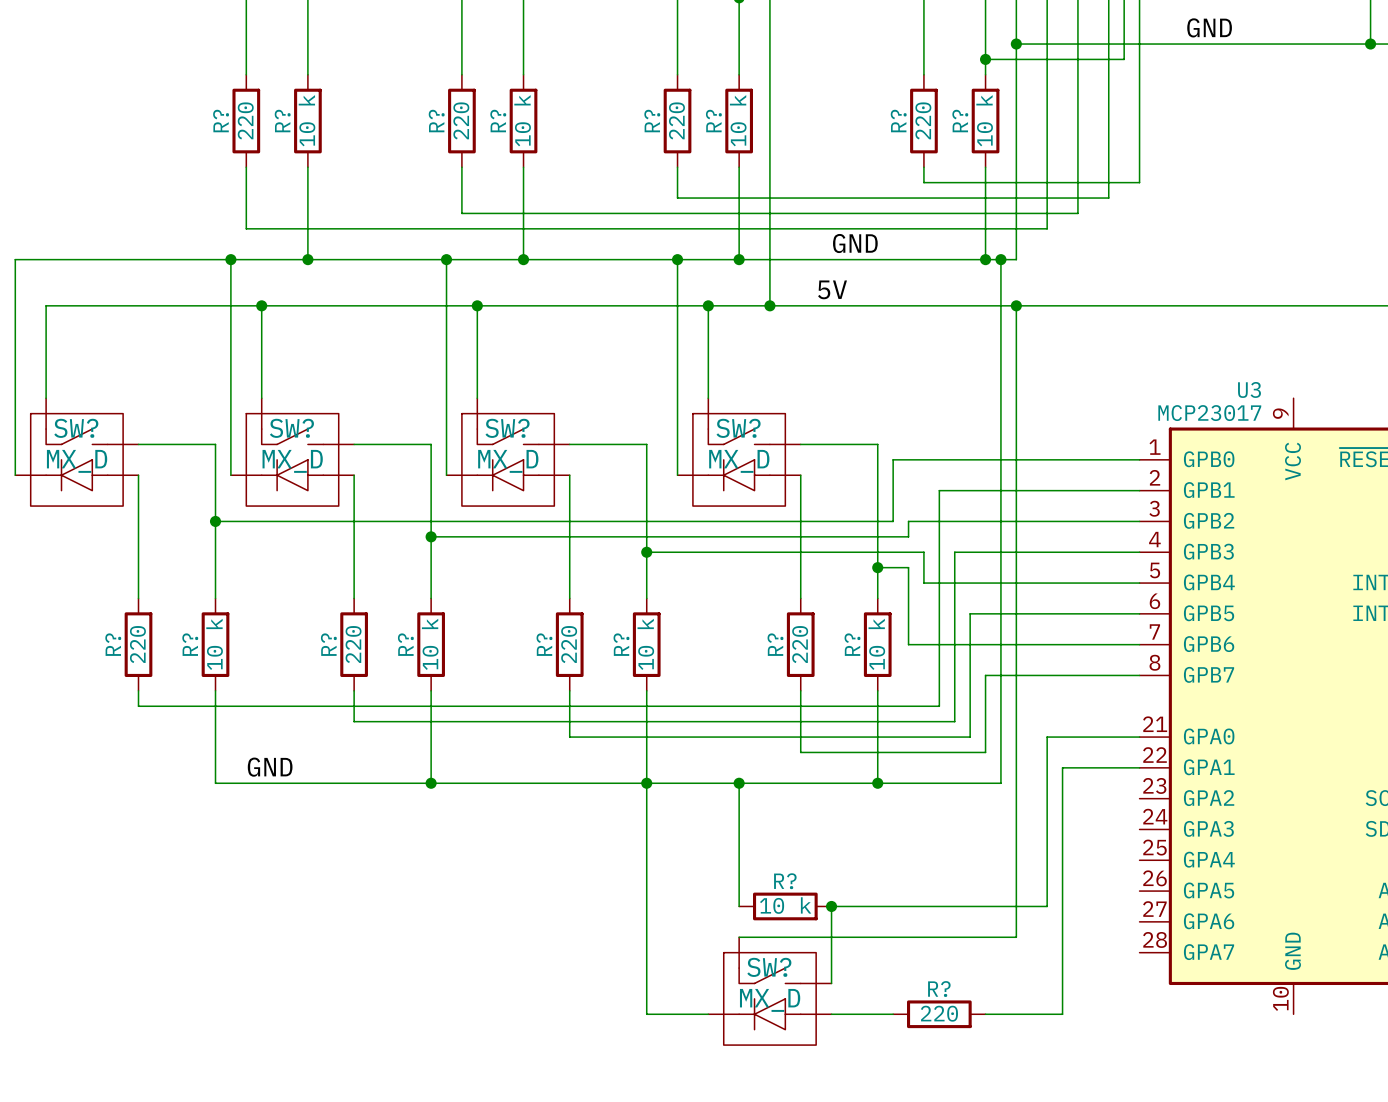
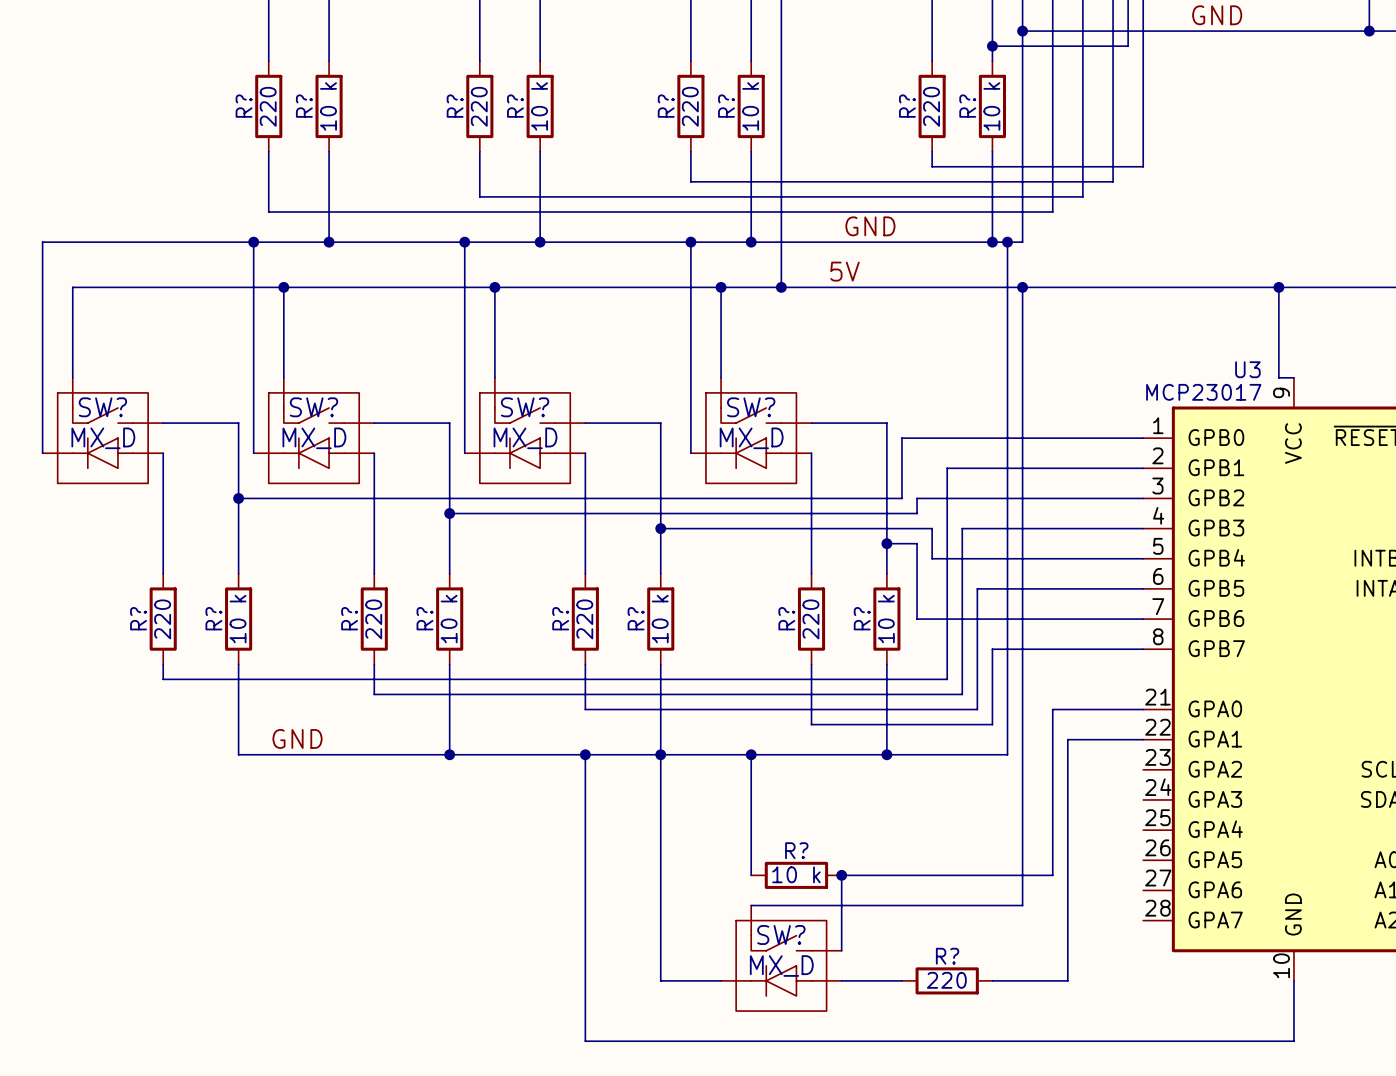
wire: none -> (1278, 287) (1278, 377) (1293, 377)
junction: none -> (1278, 287)
wire: none -> (585, 754) (585, 1041) (1293, 1041) (1293, 980)
junction: none -> (585, 754)

